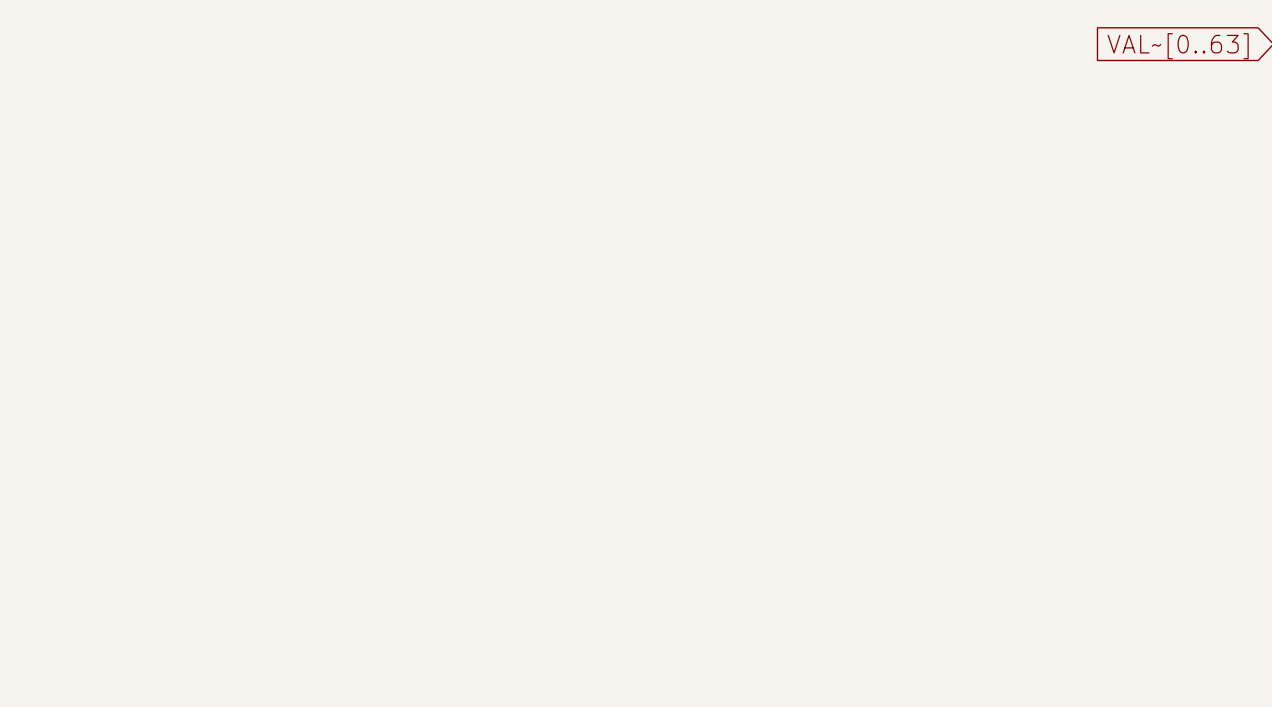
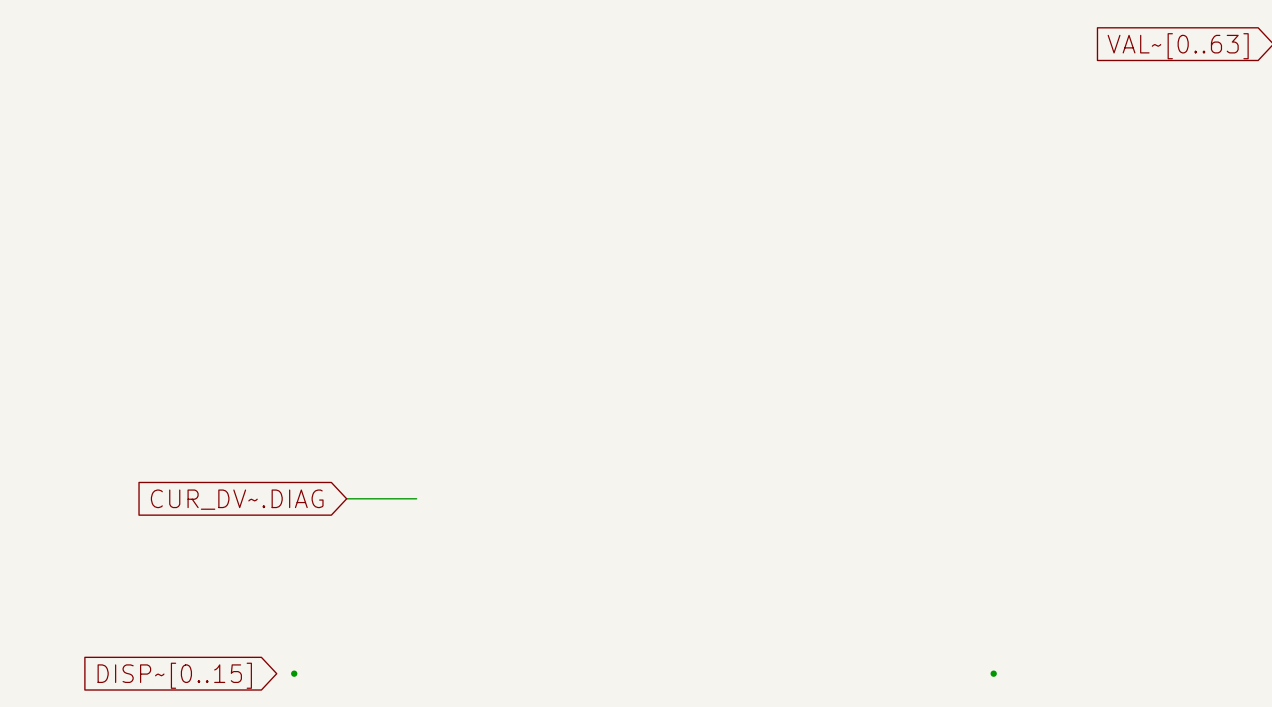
wire: none -> (346, 498) (416, 498)
global label: none -> CUR_DV~.DIAG (237, 499)
junction: none -> (294, 673)
junction: none -> (993, 673)
global label: none -> DISP~[0..15] (174, 675)

